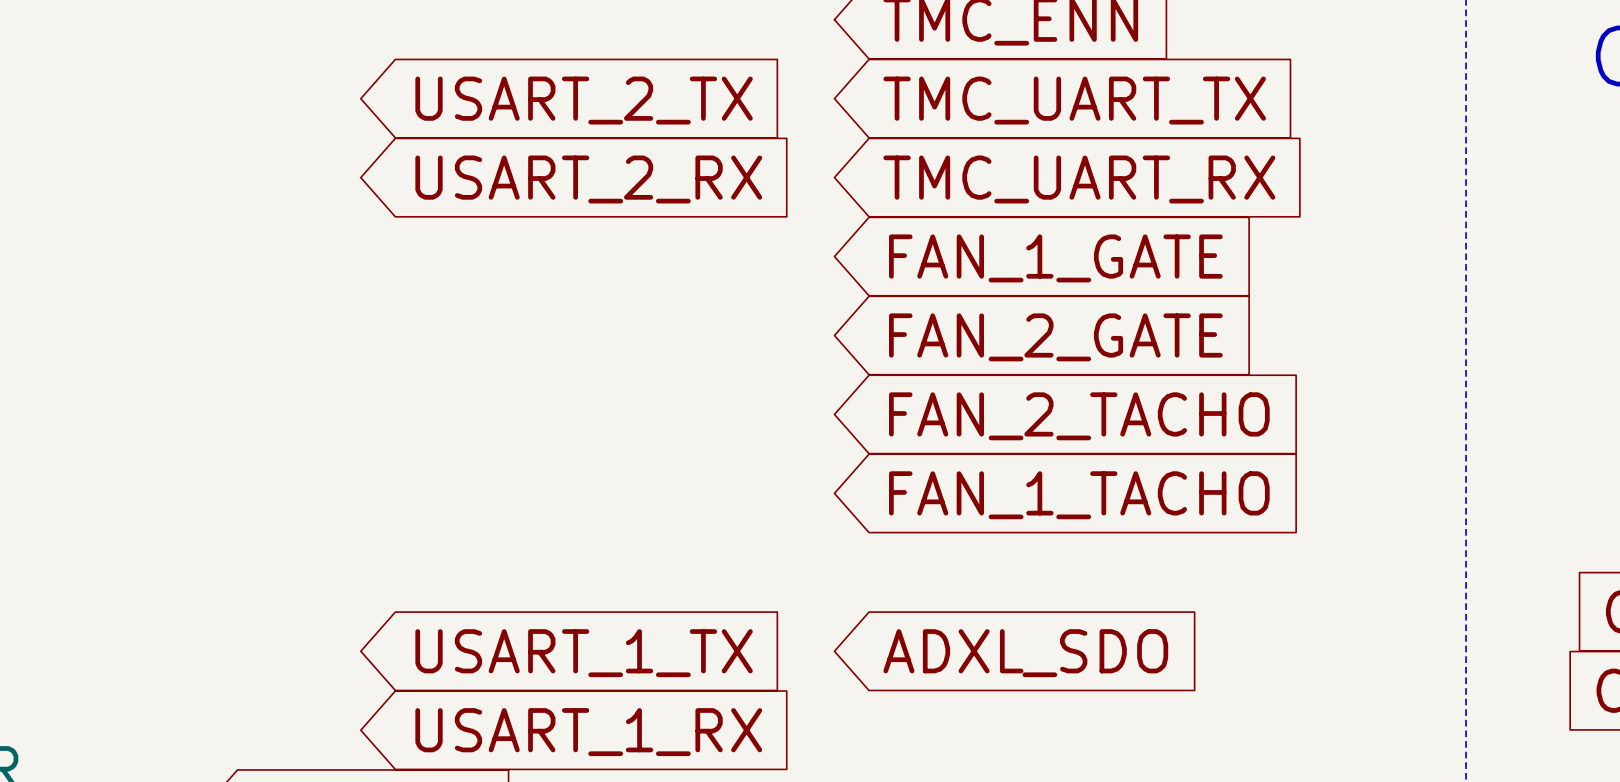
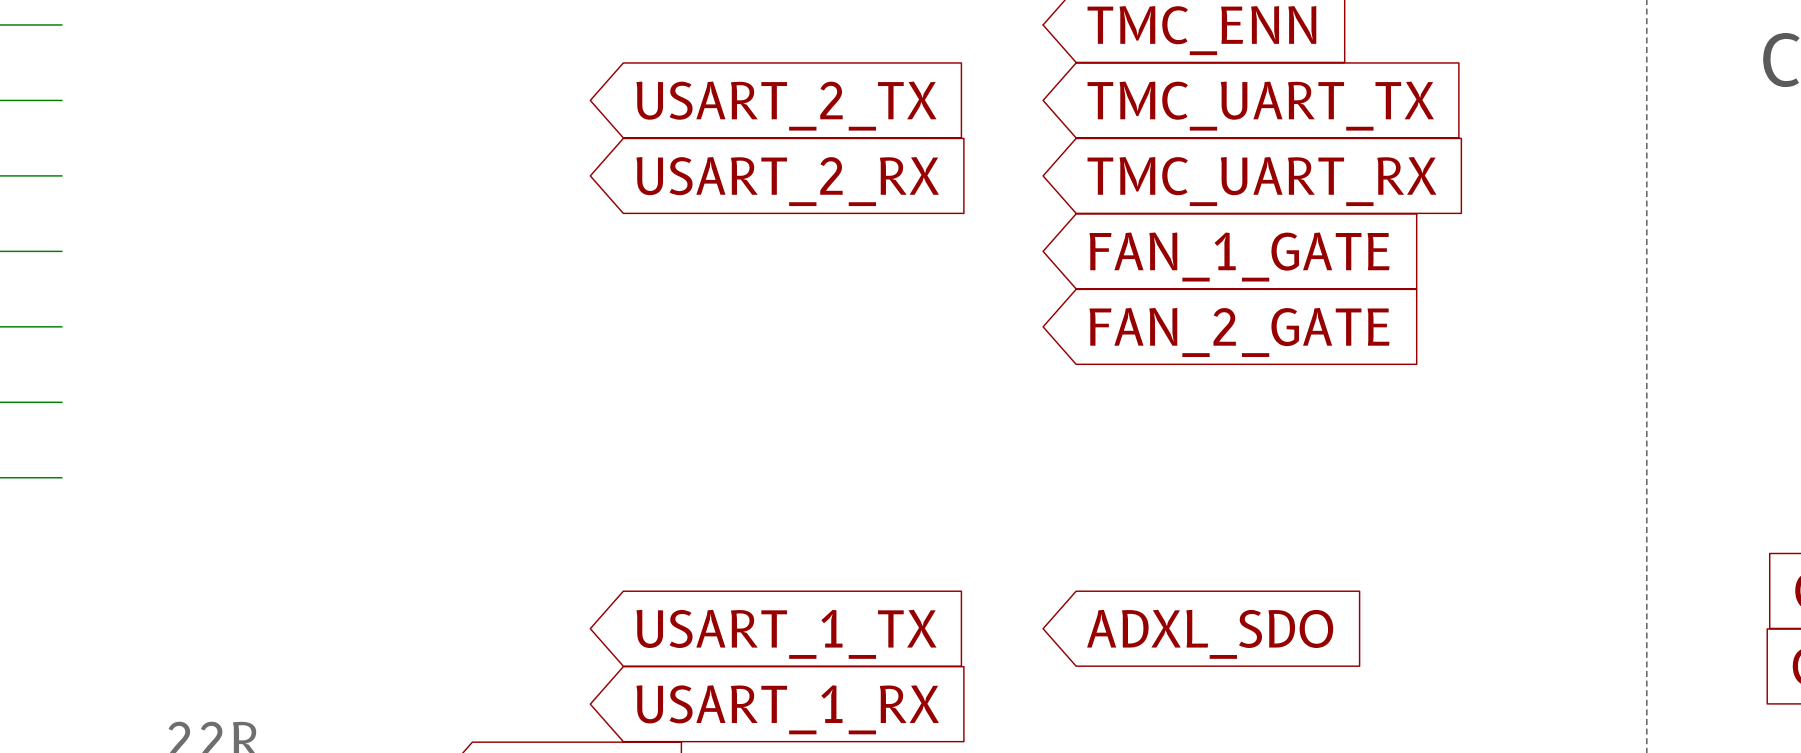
global label: FAN_2_TACHO (1079, 416) -> none
global label: FAN_1_TACHO (1079, 495) -> none

